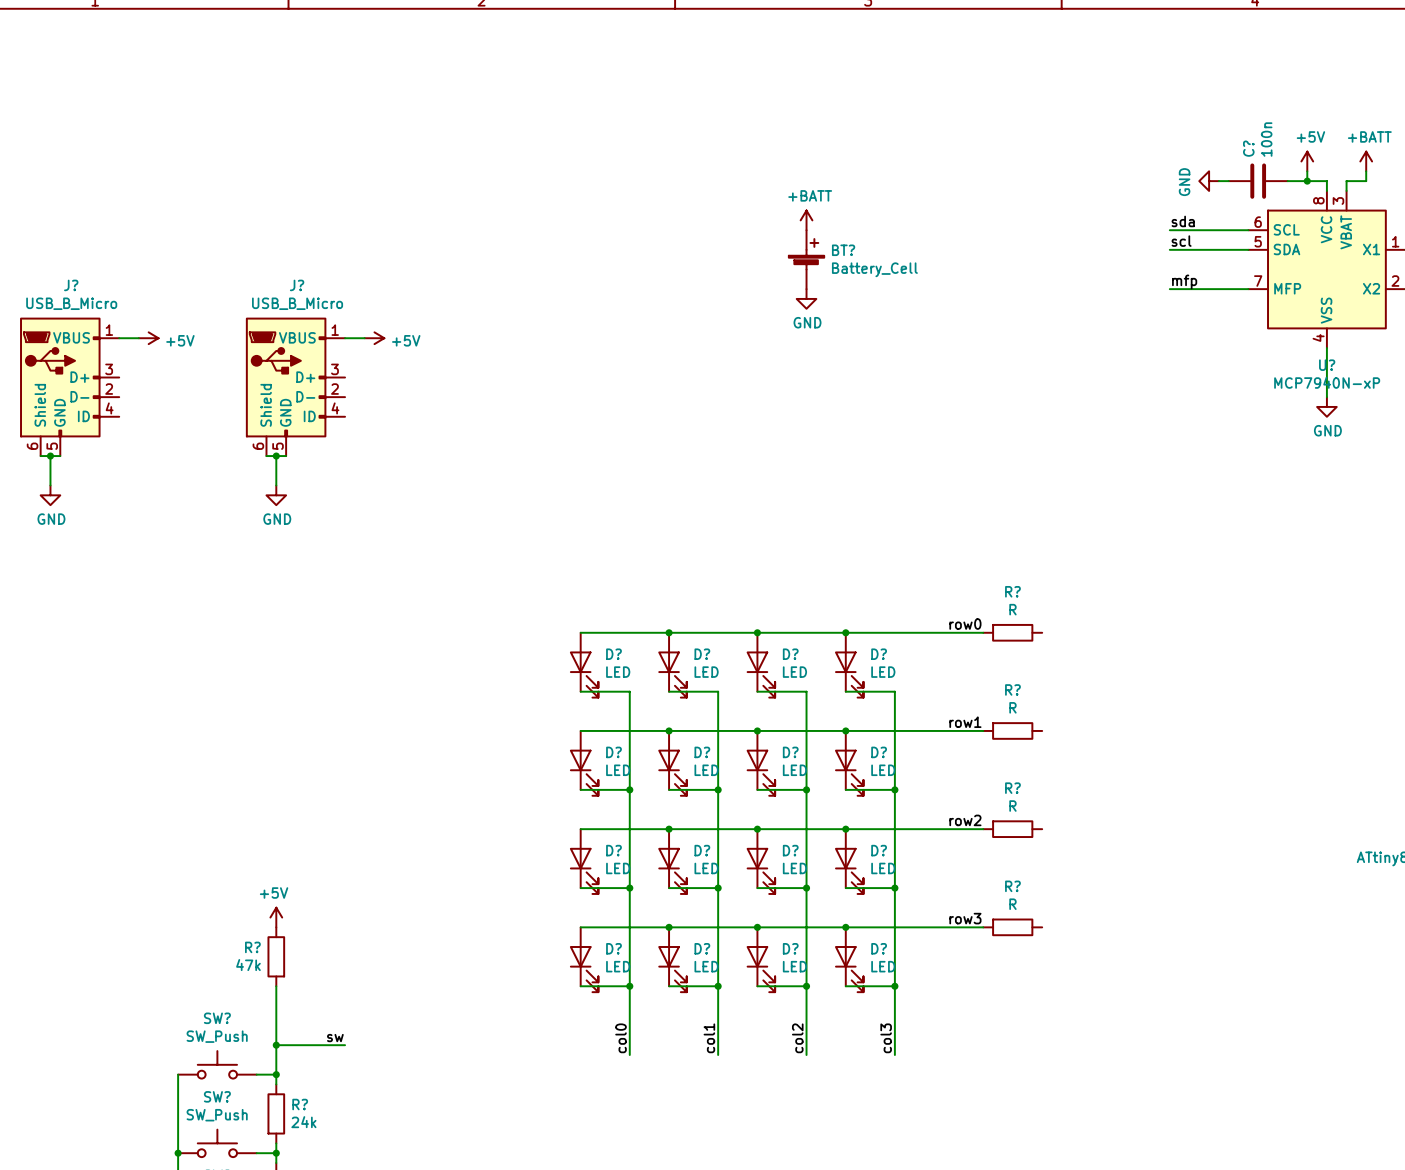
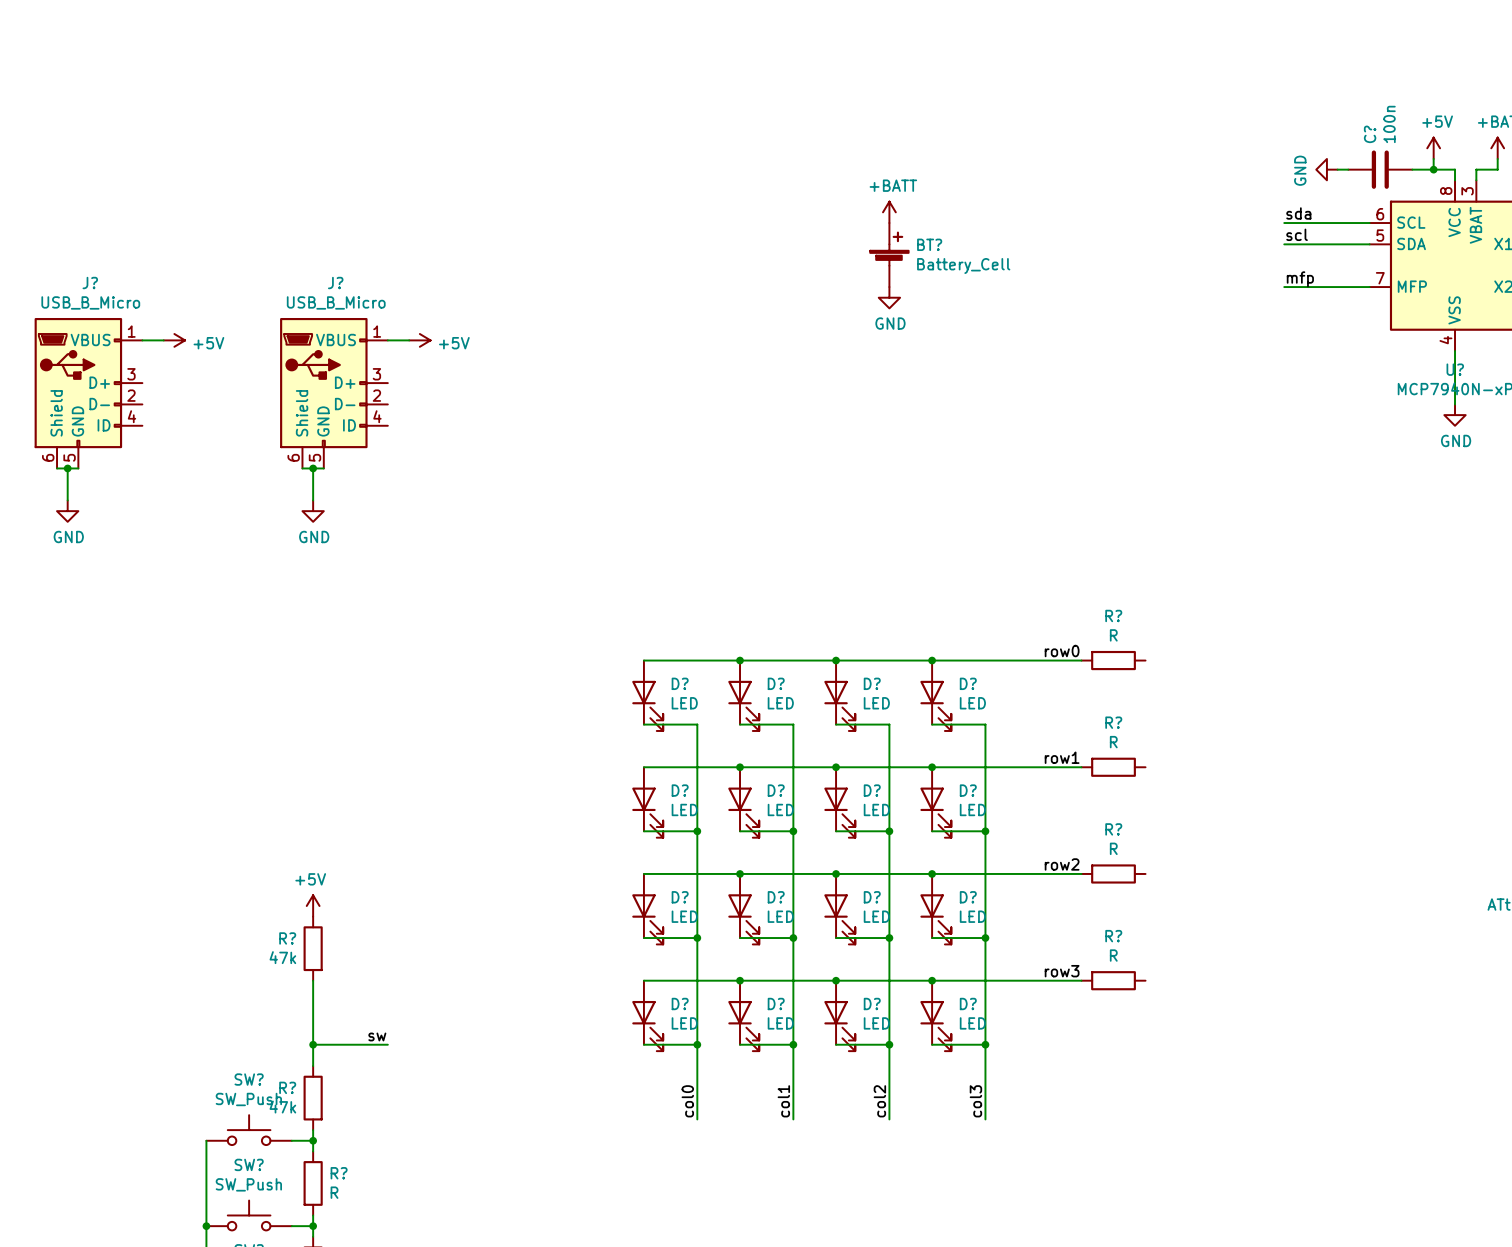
R?: none -> 47k (313, 948)
power symbol position: +5V (276, 917) -> +5V (313, 906)
wire: none -> (313, 980) (313, 1044) (387, 1044)
R?: 47k (276, 956) -> none
junction: none -> (313, 1044)
wire: (276, 1005) (276, 1064) -> none
R?: none -> 47k (313, 1098)
label position: sw (335, 1038) -> sw (377, 1036)
wire: (276, 1045) (345, 1045) -> none
junction: (276, 1045) -> none
R? value: 24k (303, 1122) -> R (334, 1192)

